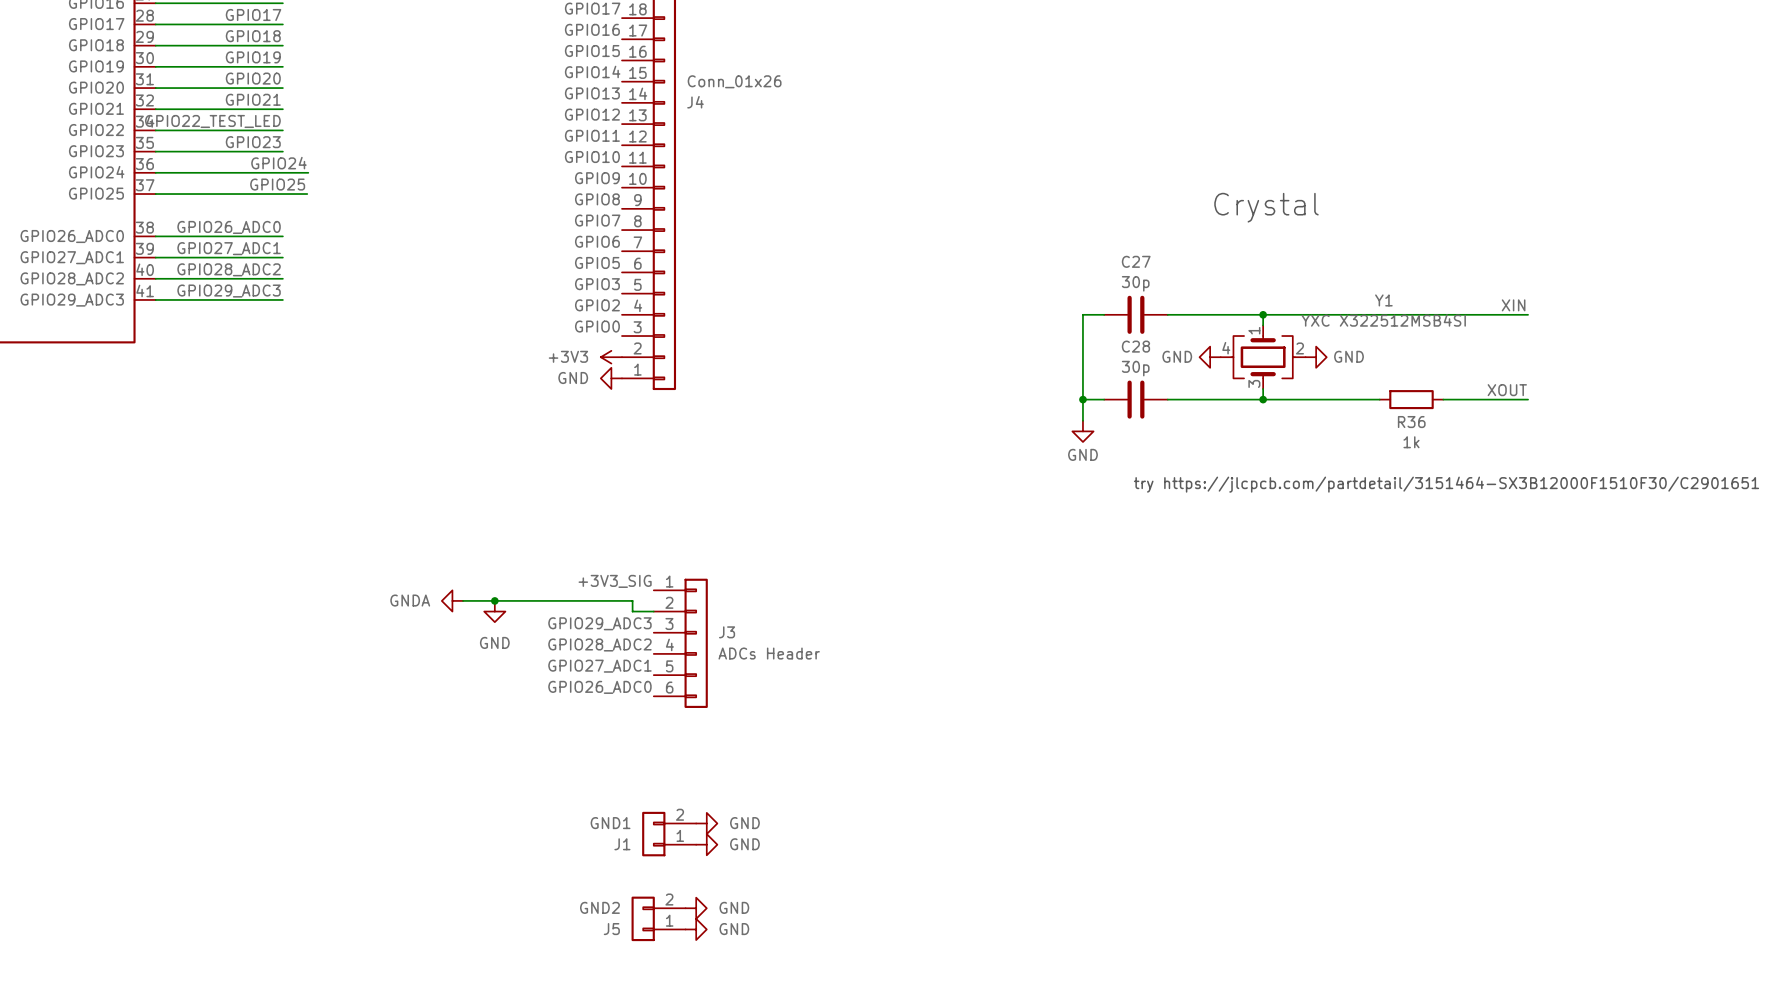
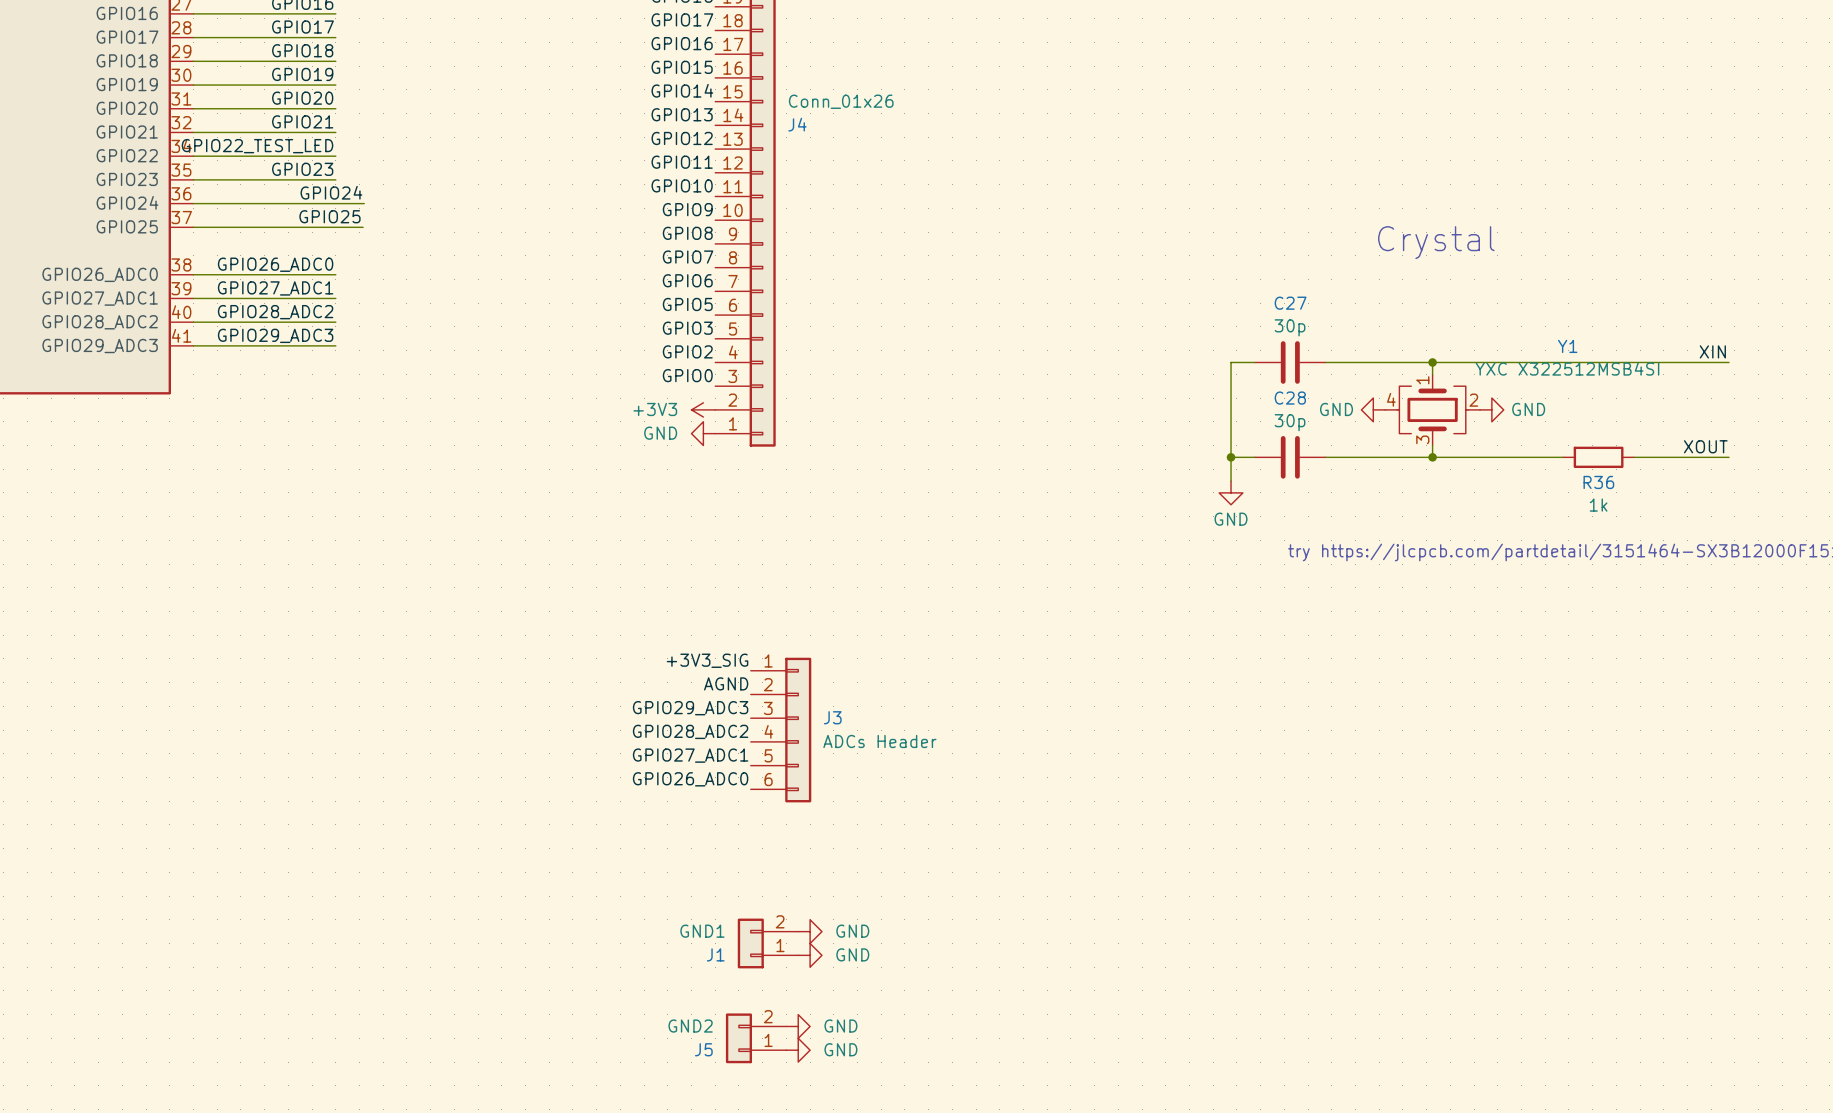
power symbol: GNDA (452, 600) -> none
wire: (463, 600) (632, 600) (632, 611) (653, 611) -> none
junction: (494, 600) -> none
label: none -> AGND (726, 683)
power symbol: GND (494, 611) -> none

